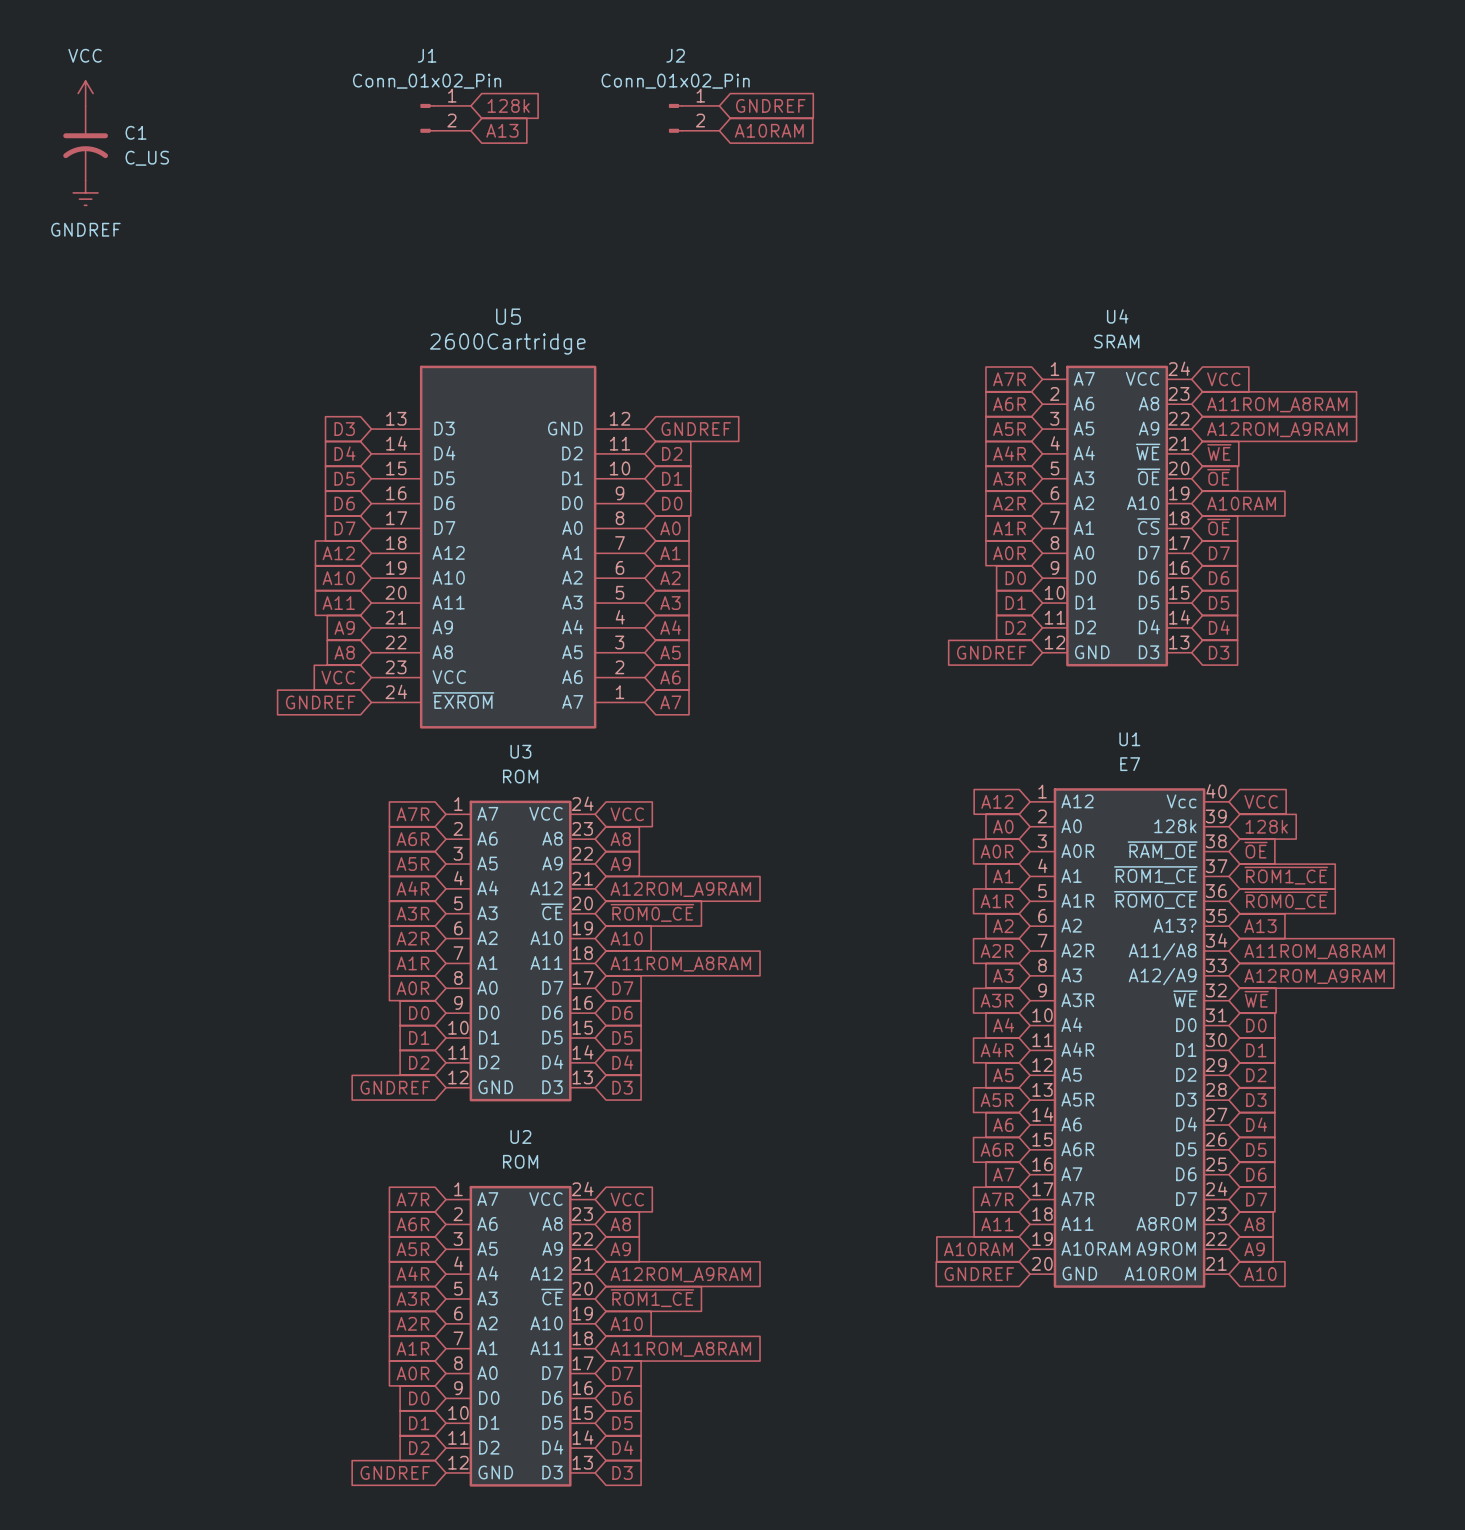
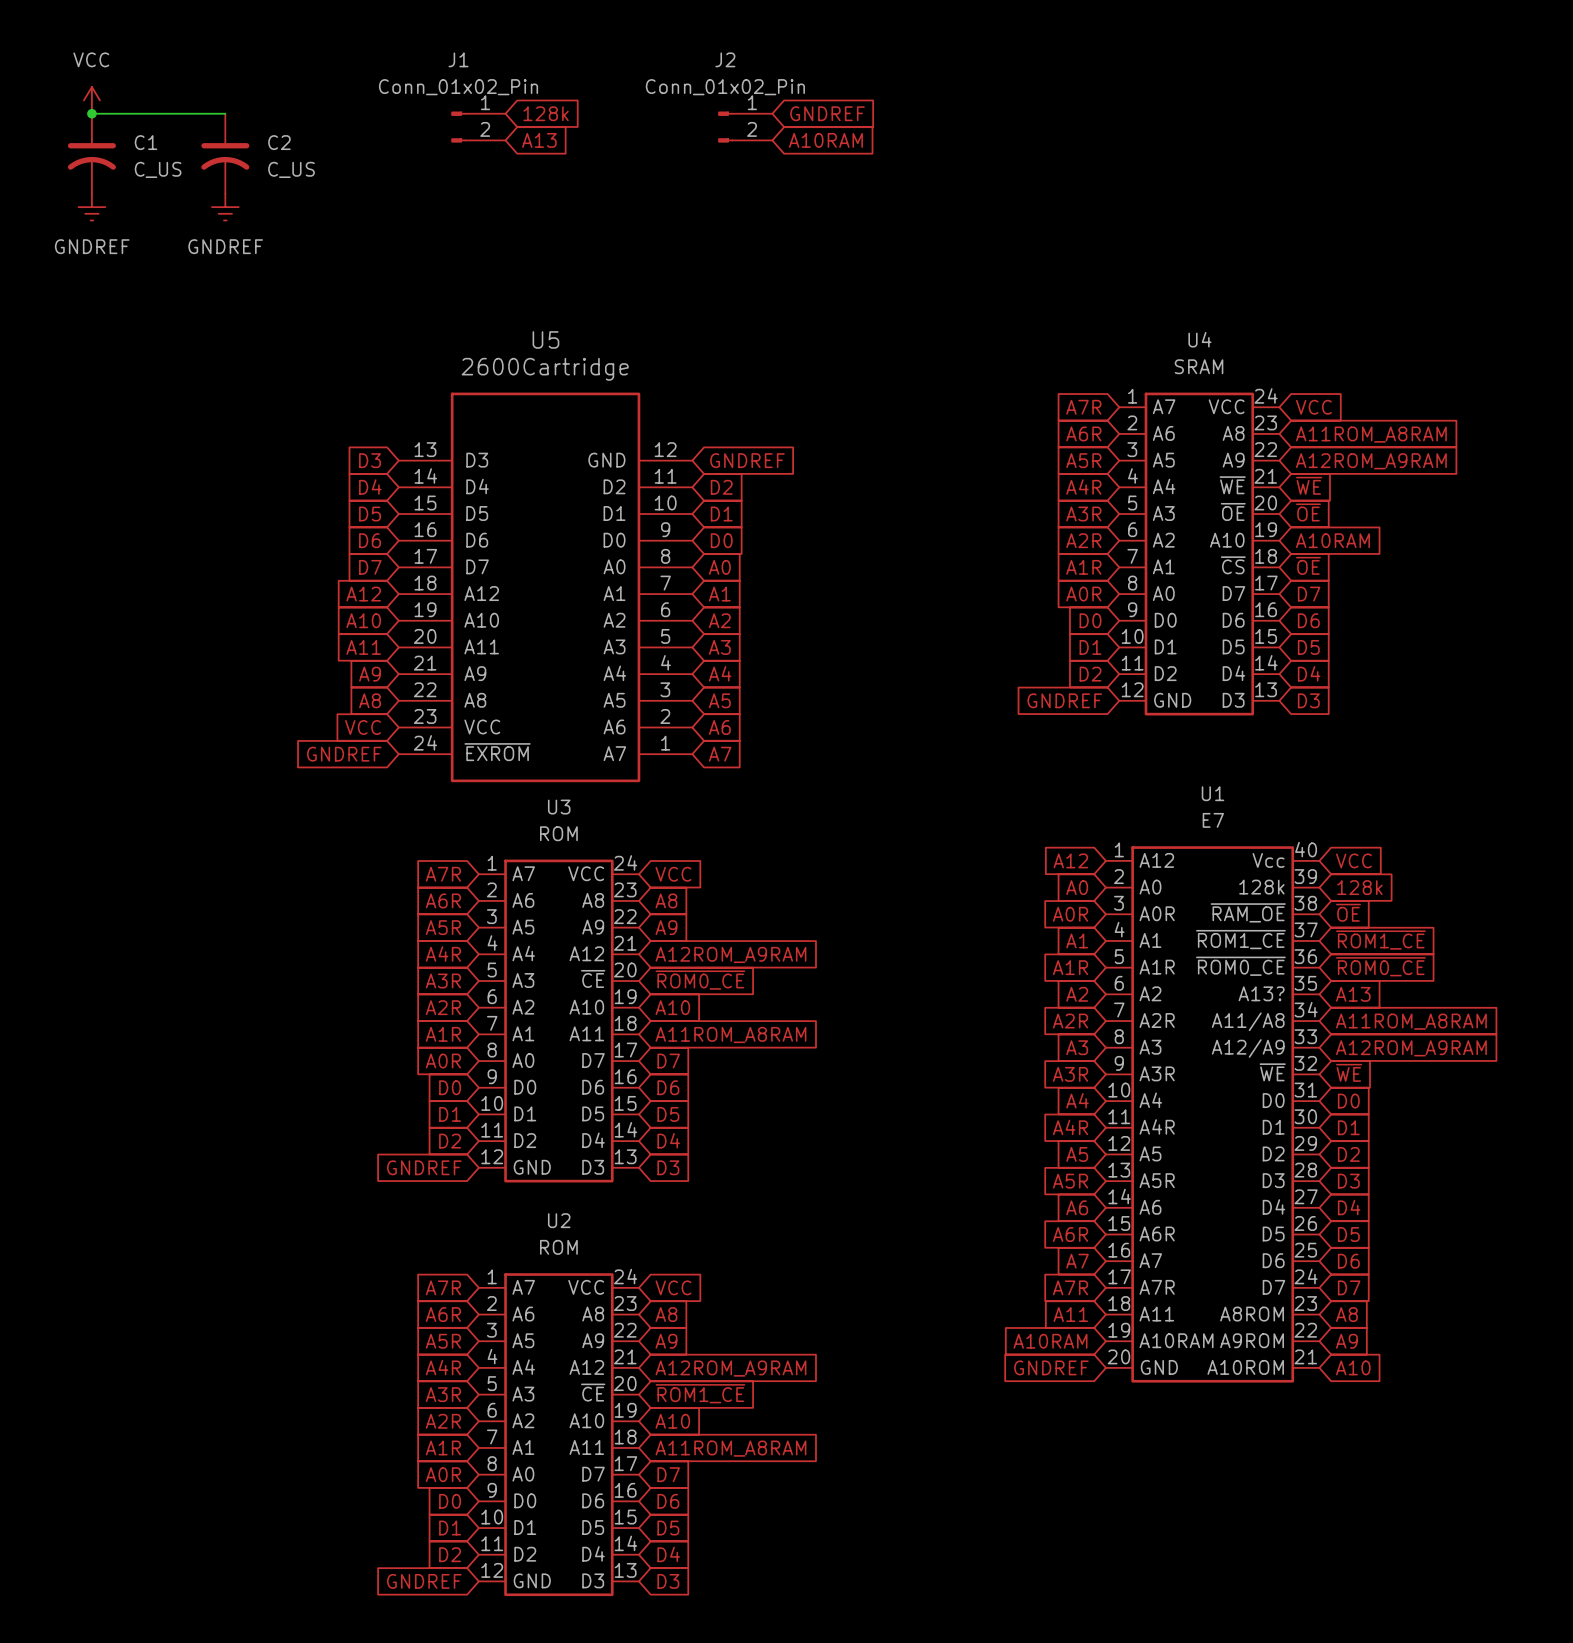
wire: none -> (91, 113) (225, 113)
junction: none -> (91, 113)
C2: none -> C_US (225, 153)
power symbol: none -> GNDREF (225, 207)

